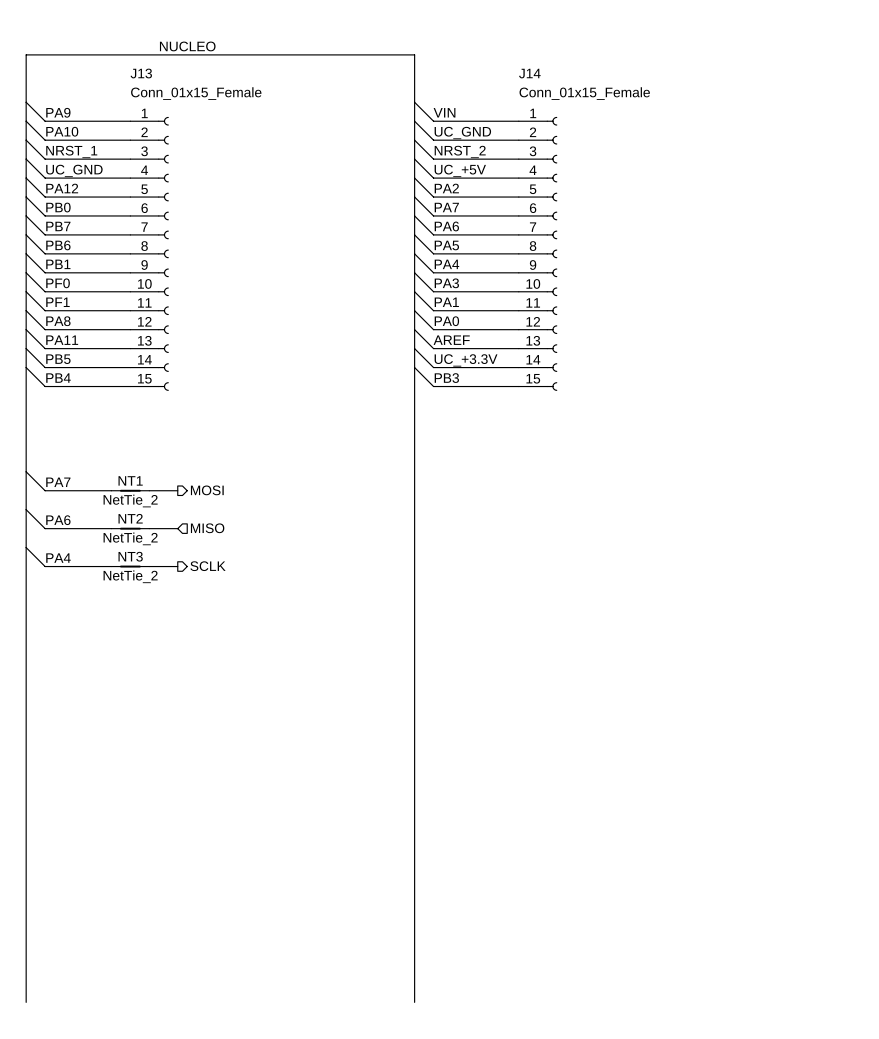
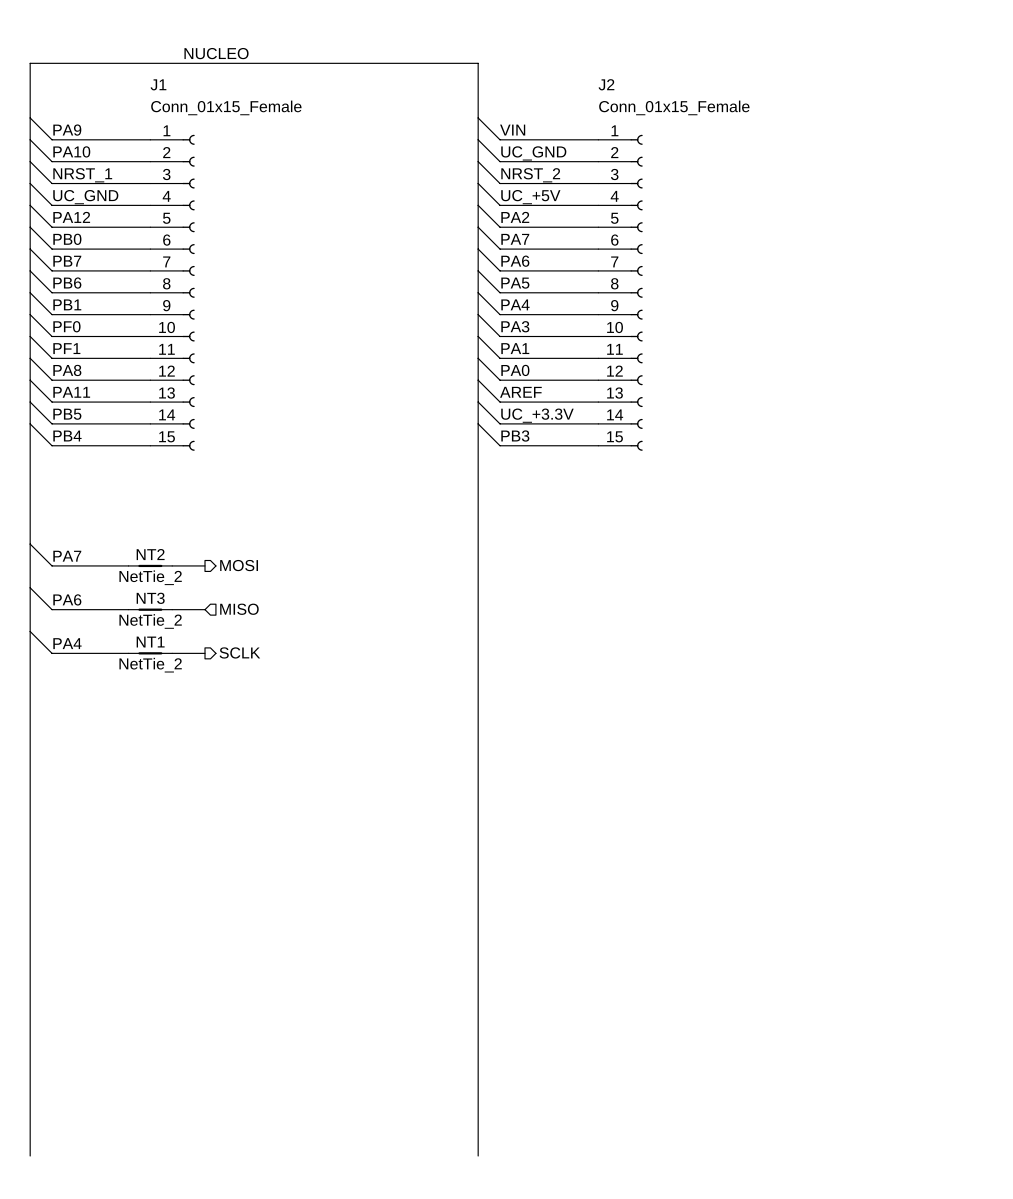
J13 name: J13 (141, 73) -> J1 (158, 84)
J14 name: J14 (529, 73) -> J2 (606, 84)
NT1 name: NT1 (130, 480) -> NT2 (150, 554)
NT2 name: NT2 (130, 518) -> NT3 (150, 598)
NT3 name: NT3 (130, 556) -> NT1 (150, 642)

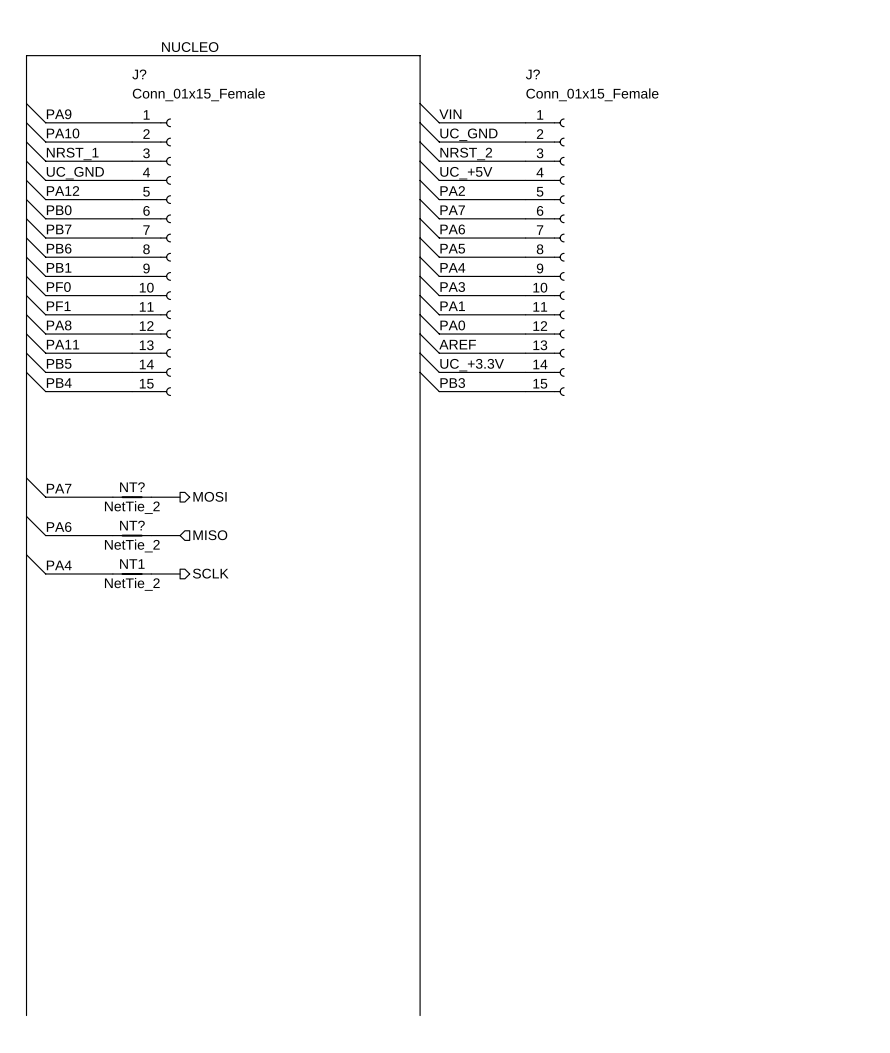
J1 name: J1 (158, 84) -> J? (139, 74)
J2 name: J2 (606, 84) -> J? (532, 74)
NT2 name: NT2 (150, 554) -> NT? (132, 487)
NT3 name: NT3 (150, 598) -> NT? (132, 525)

